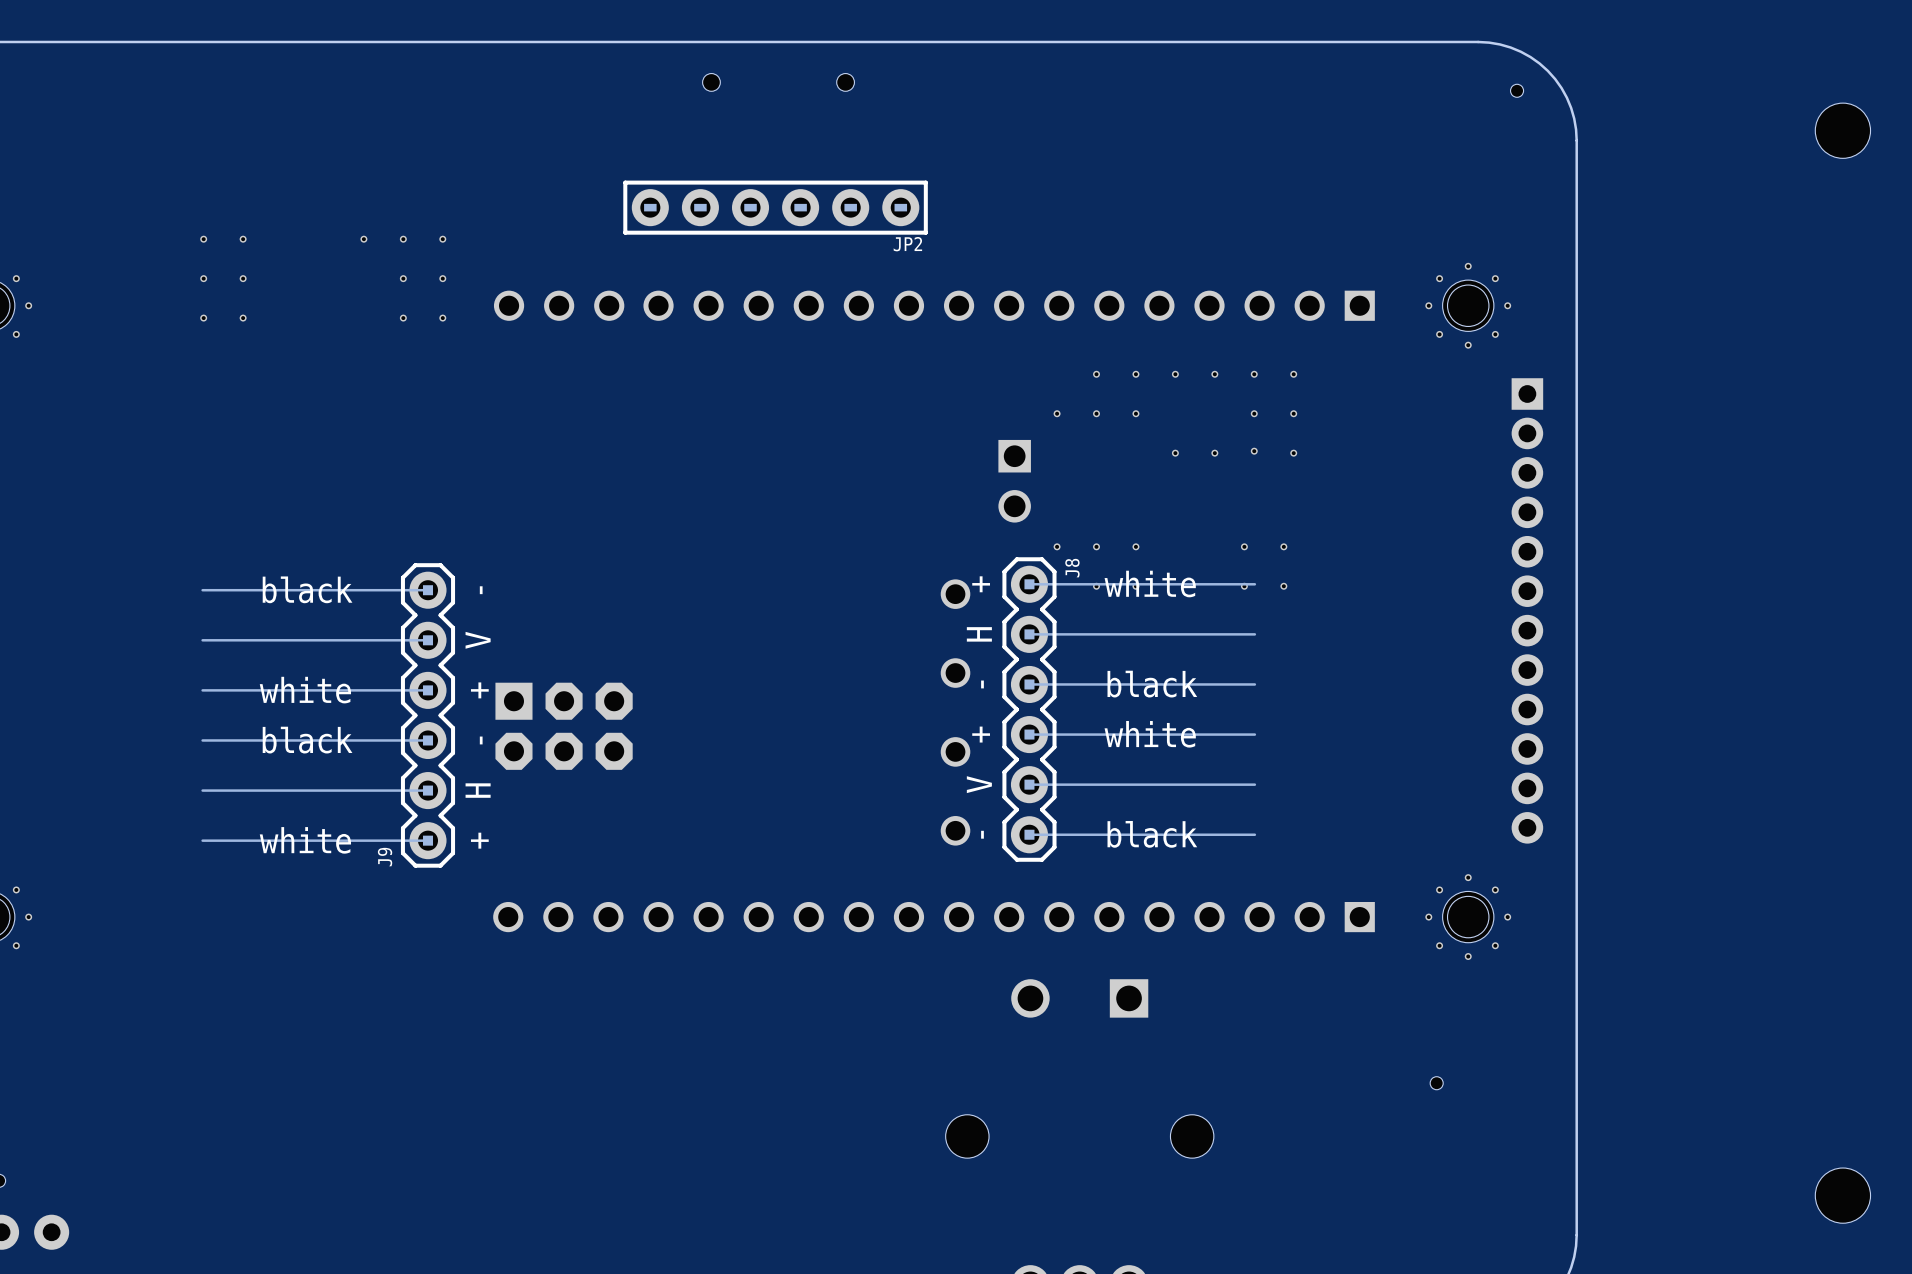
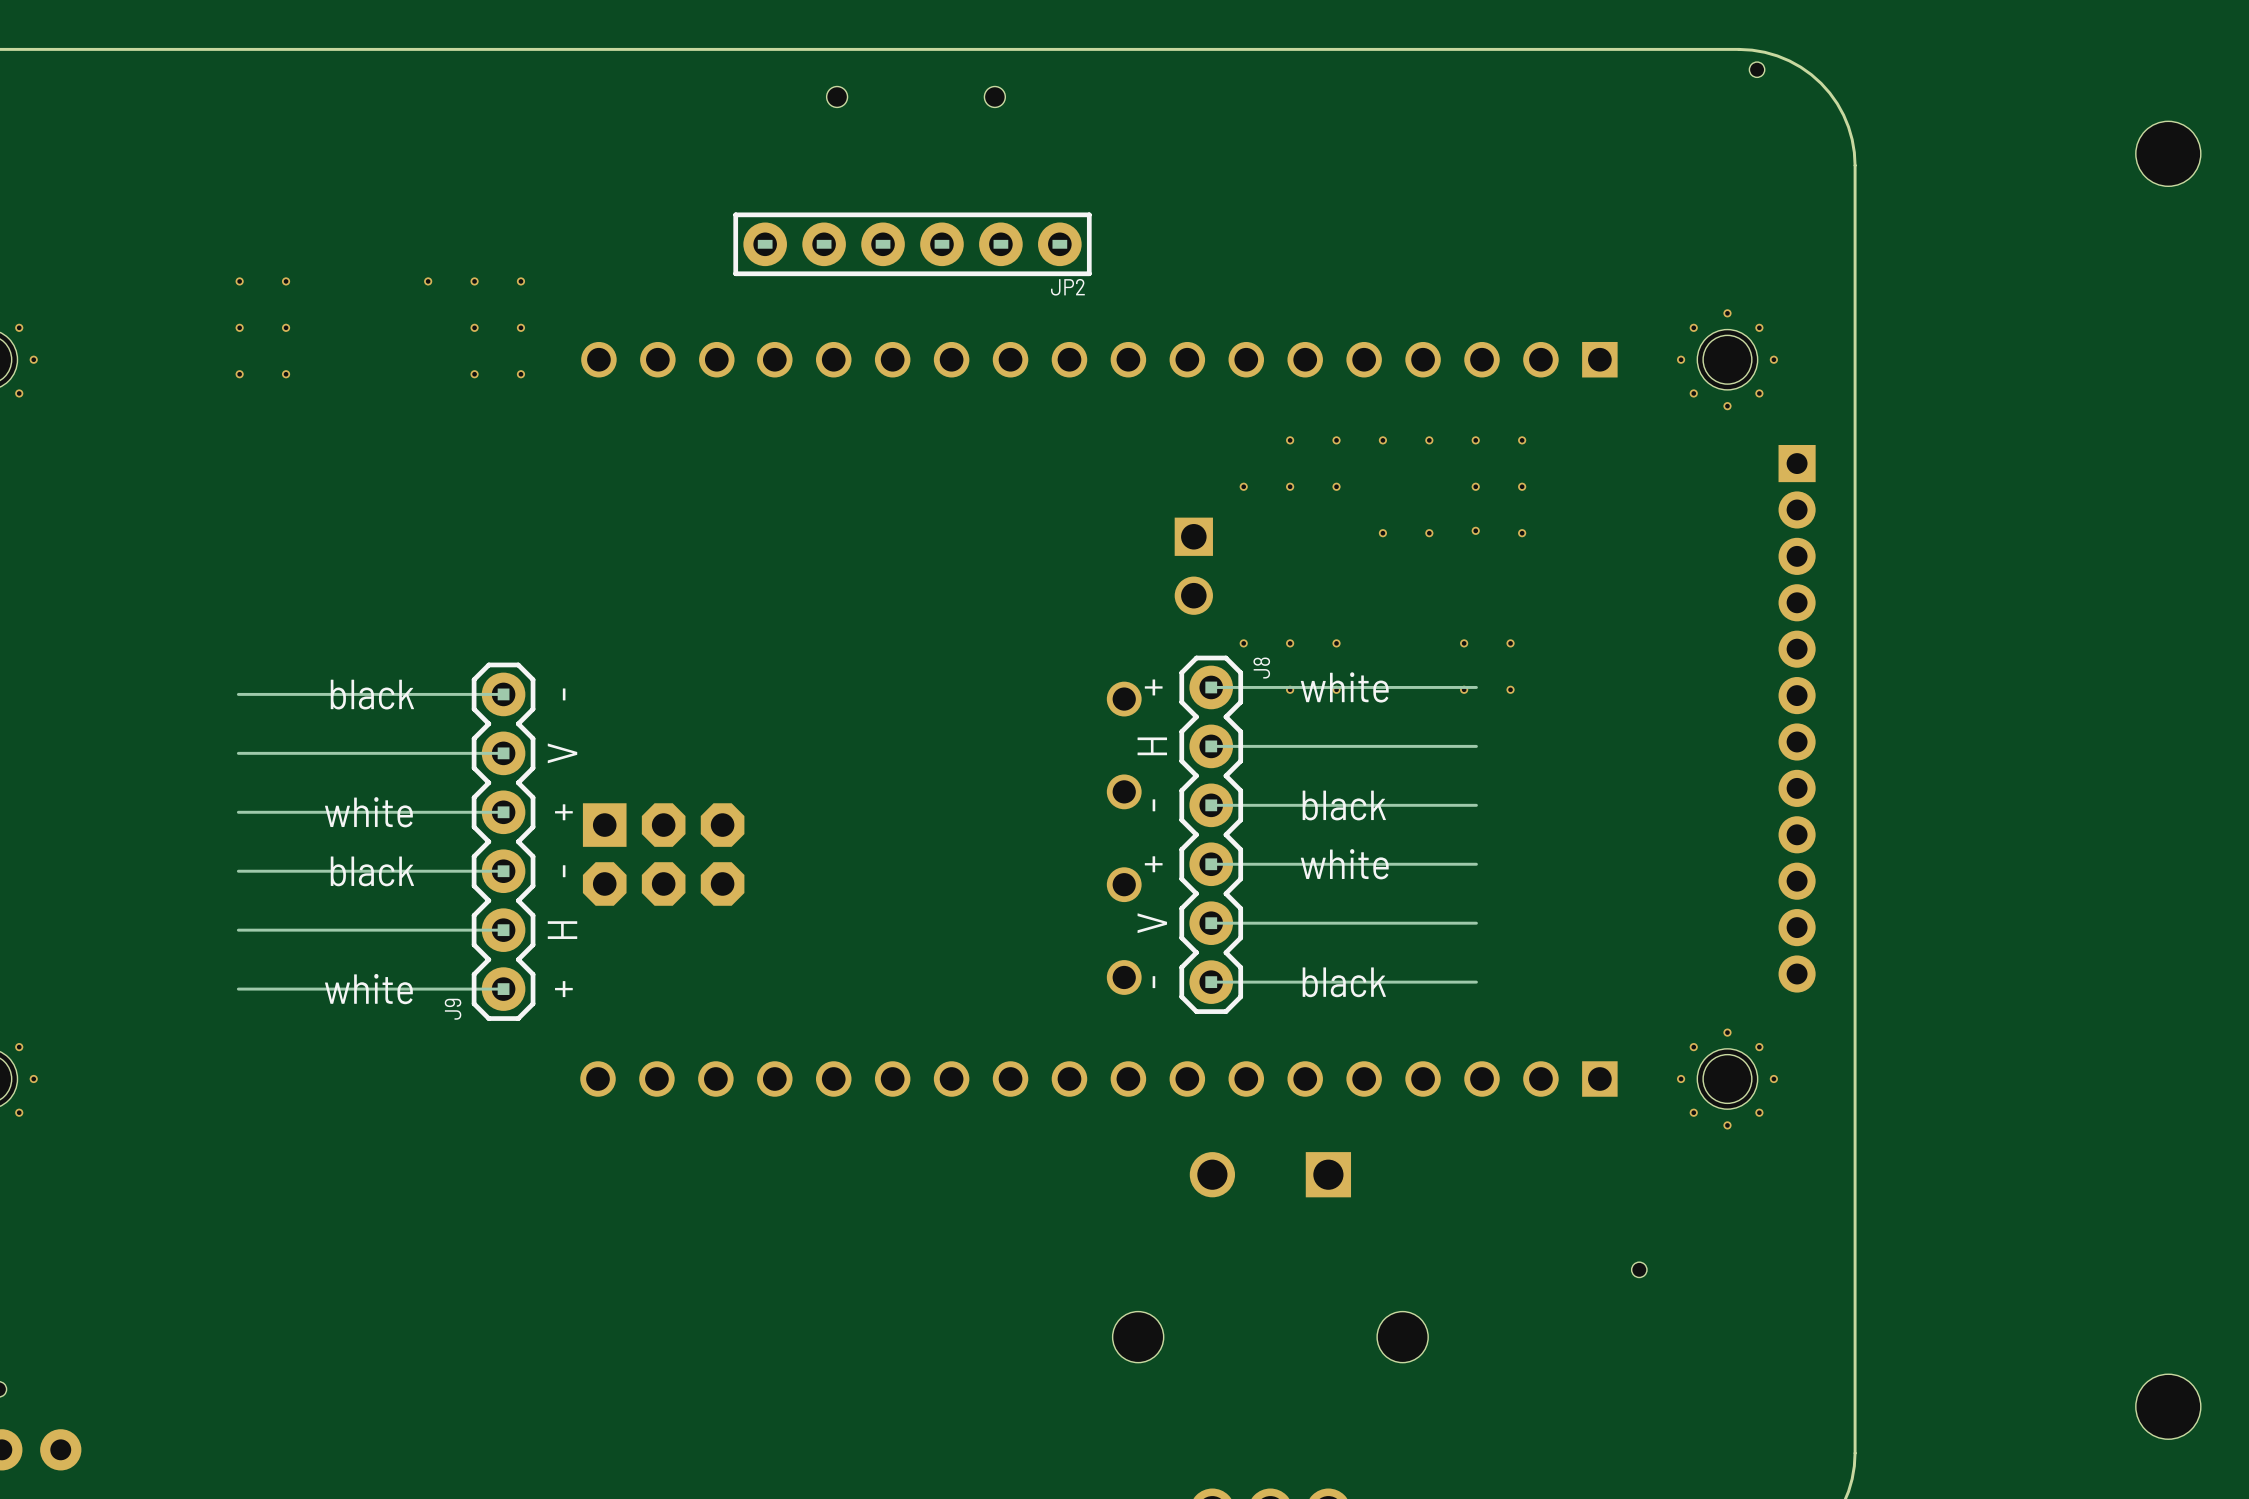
part position: (1517, 90) -> (1757, 69)
part position: (1436, 1083) -> (1639, 1269)

